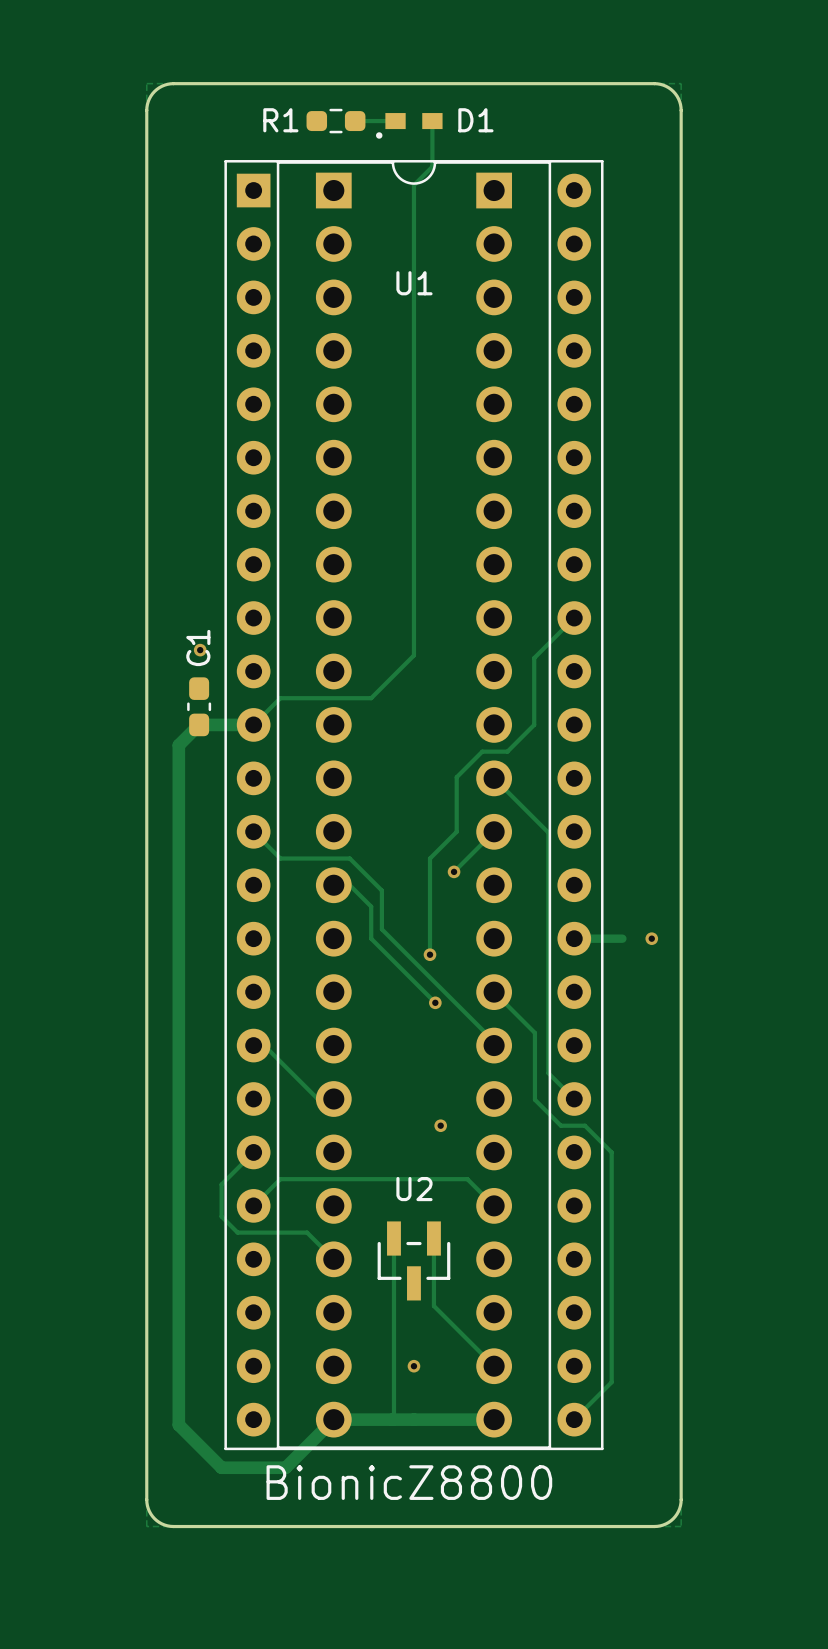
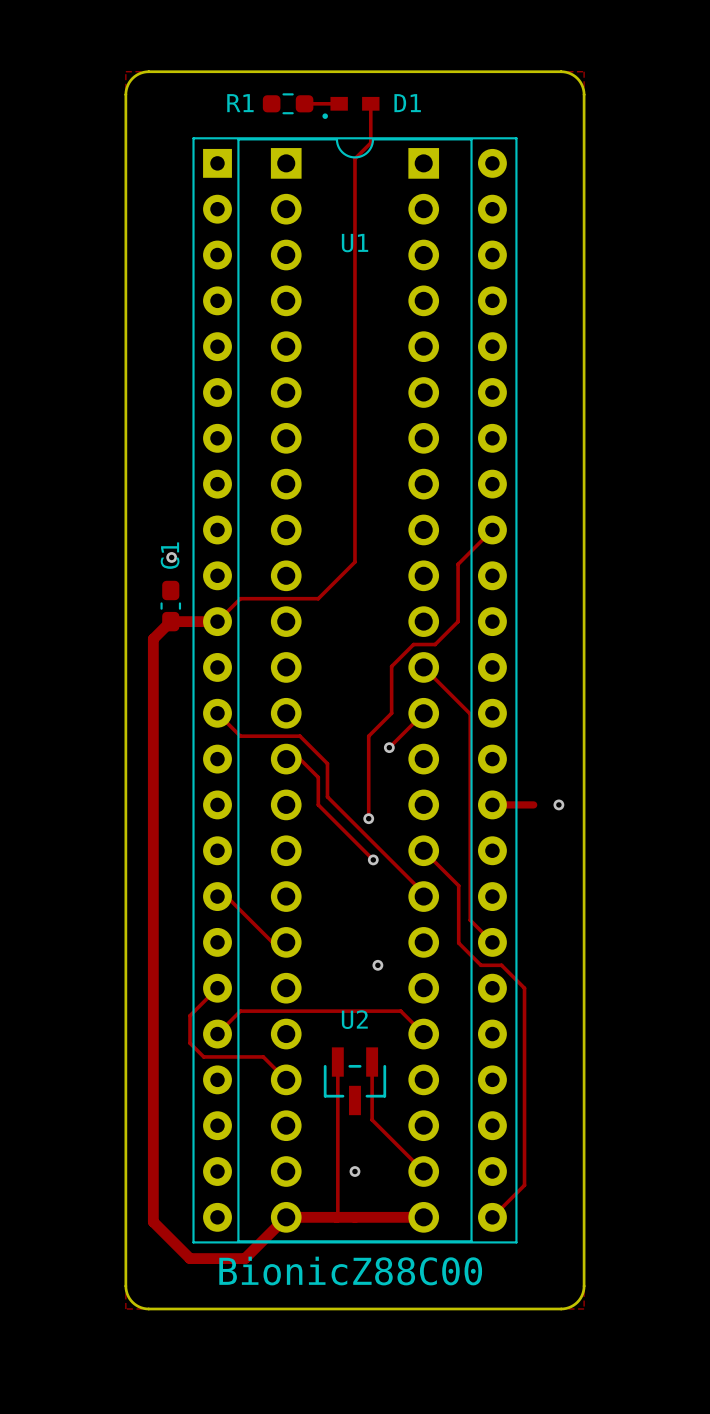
text: BionicZ8800 (409, 1482) -> BionicZ88C00 (350, 1271)

